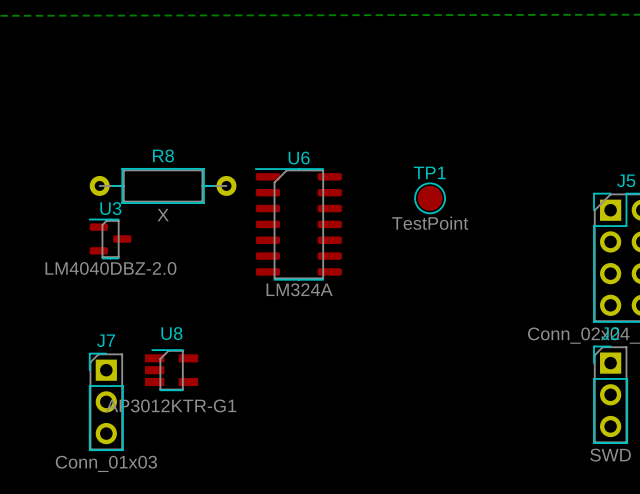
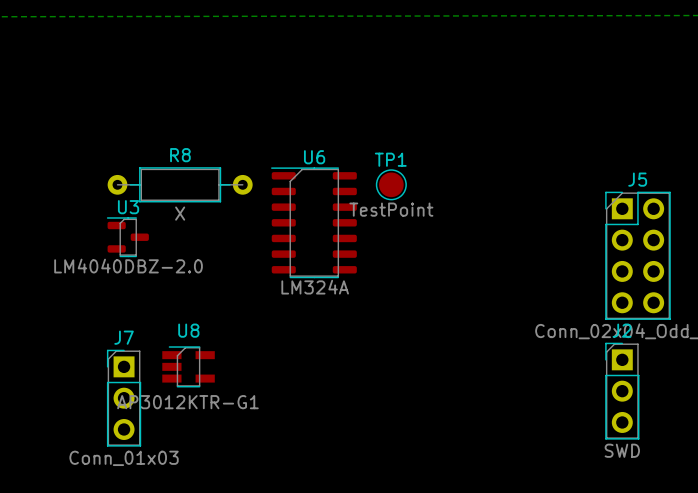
TP1 position: (430, 198) -> (391, 184)

